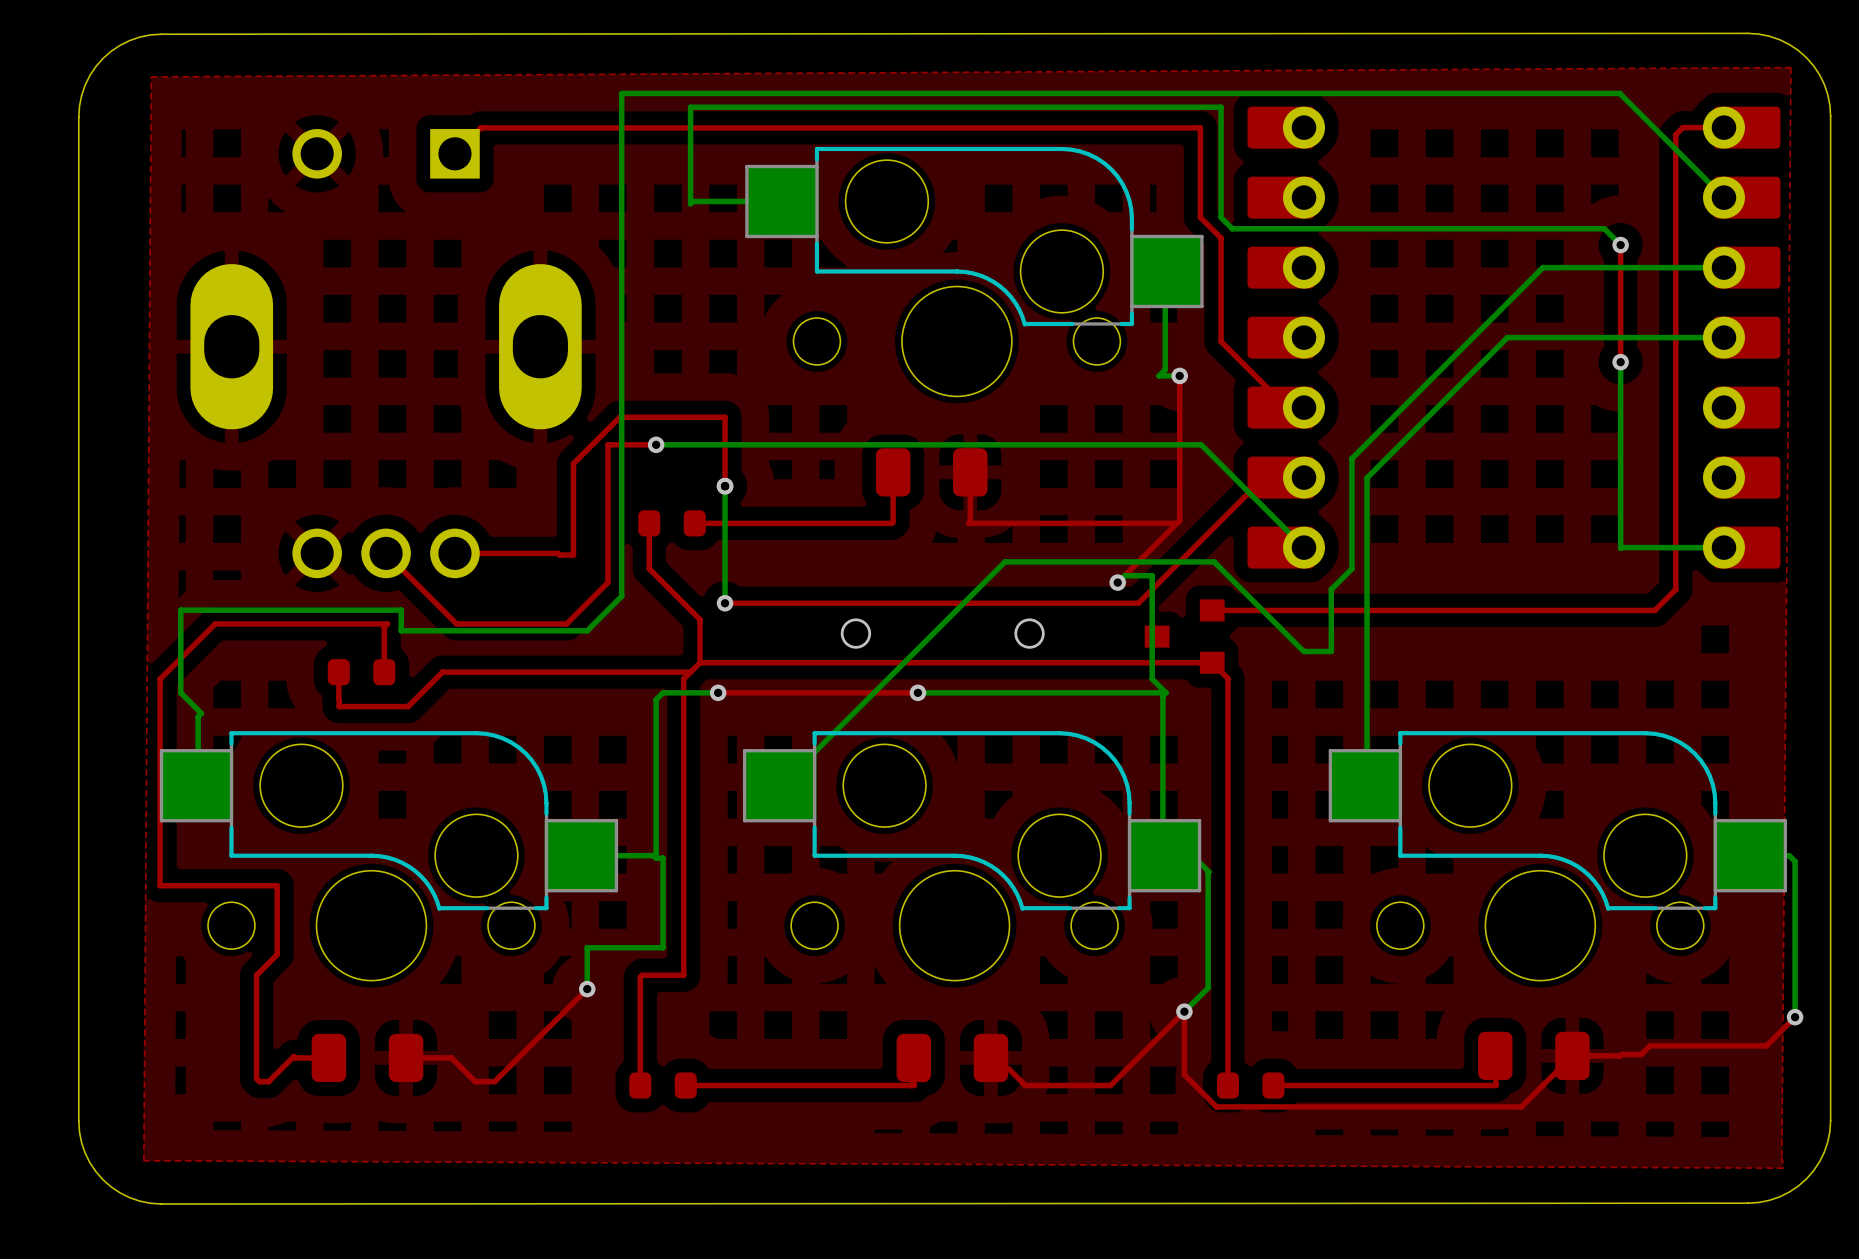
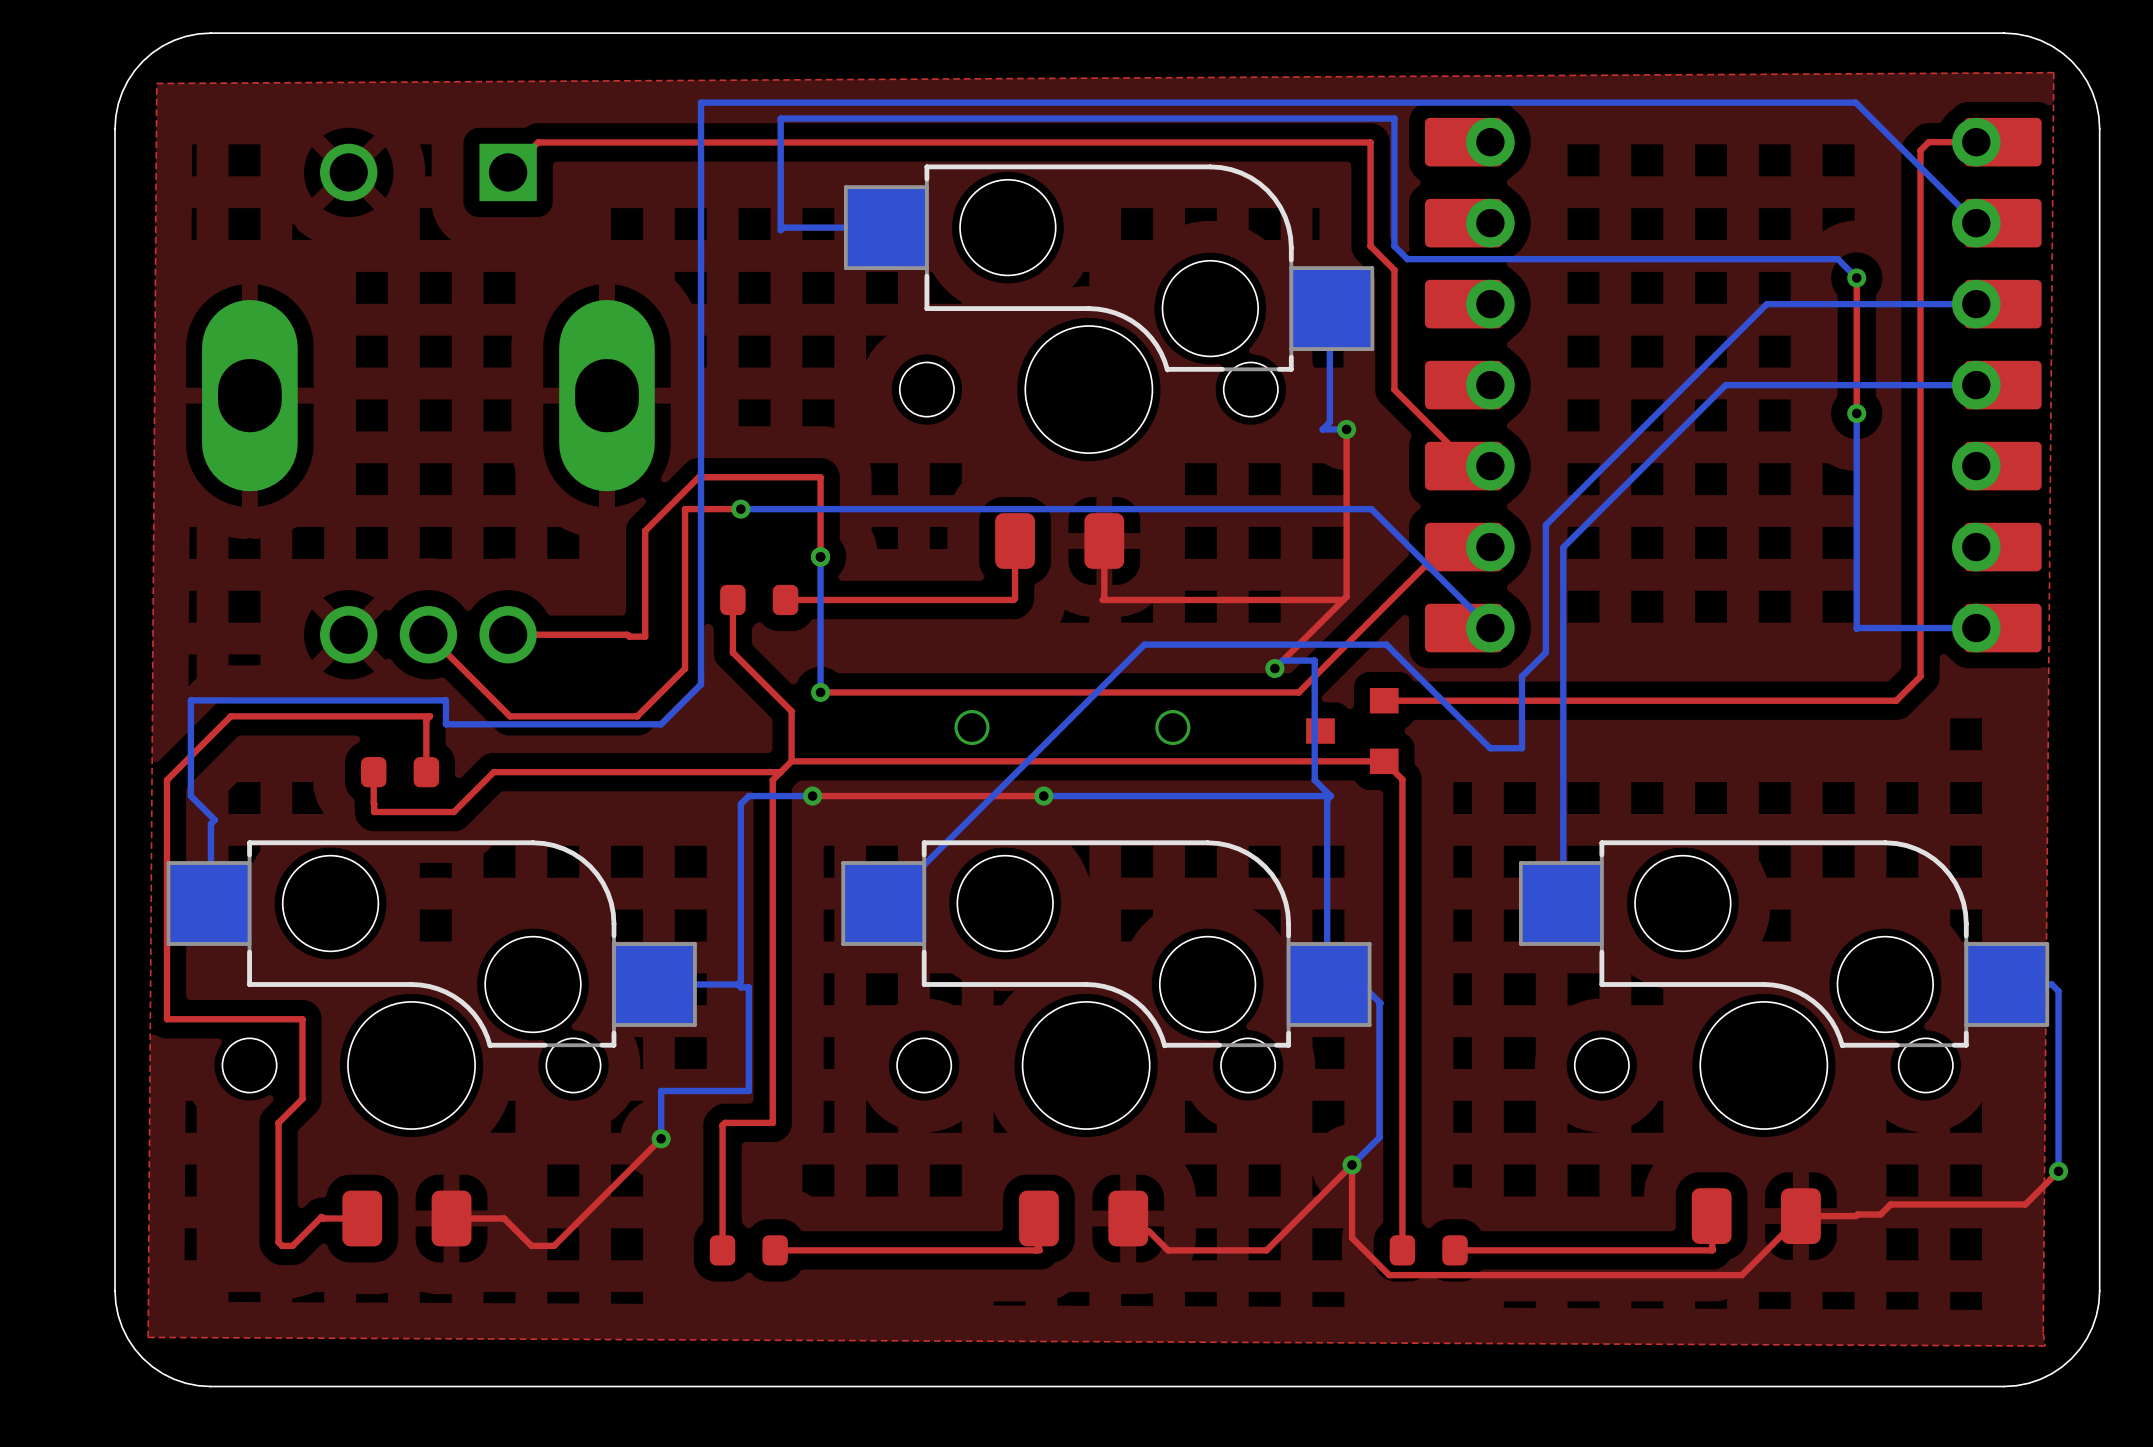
board edge: (1747, 33) (161, 34) (129, 40) (103, 58) (85, 85) (78, 116) (78, 1121) (81, 1142) (89, 1162) (103, 1179) (120, 1192) (140, 1201) (161, 1204) (1747, 1203) -> (2004, 33) (210, 33) (185, 36) (174, 40) (152, 52) (143, 61) (134, 70) (122, 92) (118, 104) (115, 128) (115, 1290) (118, 1315) (127, 1338) (143, 1358) (162, 1373) (185, 1383) (210, 1386) (2004, 1386)

